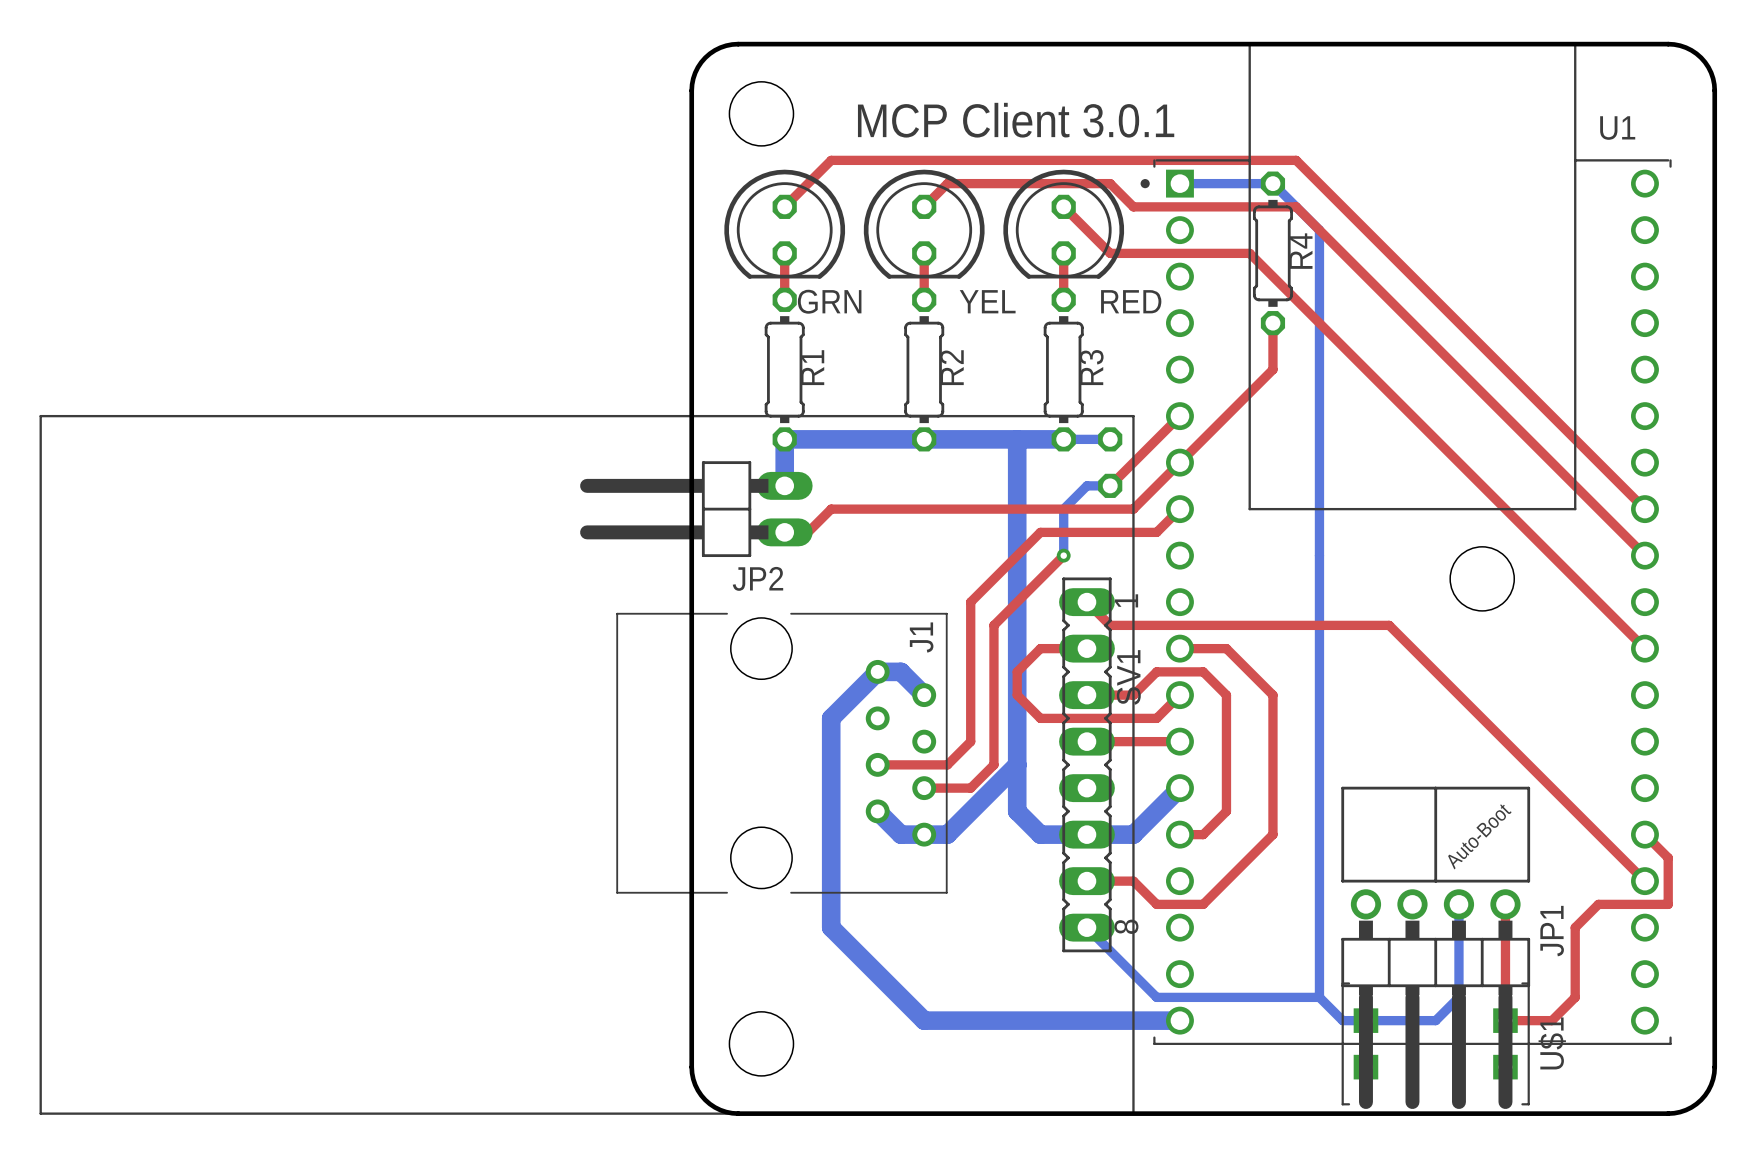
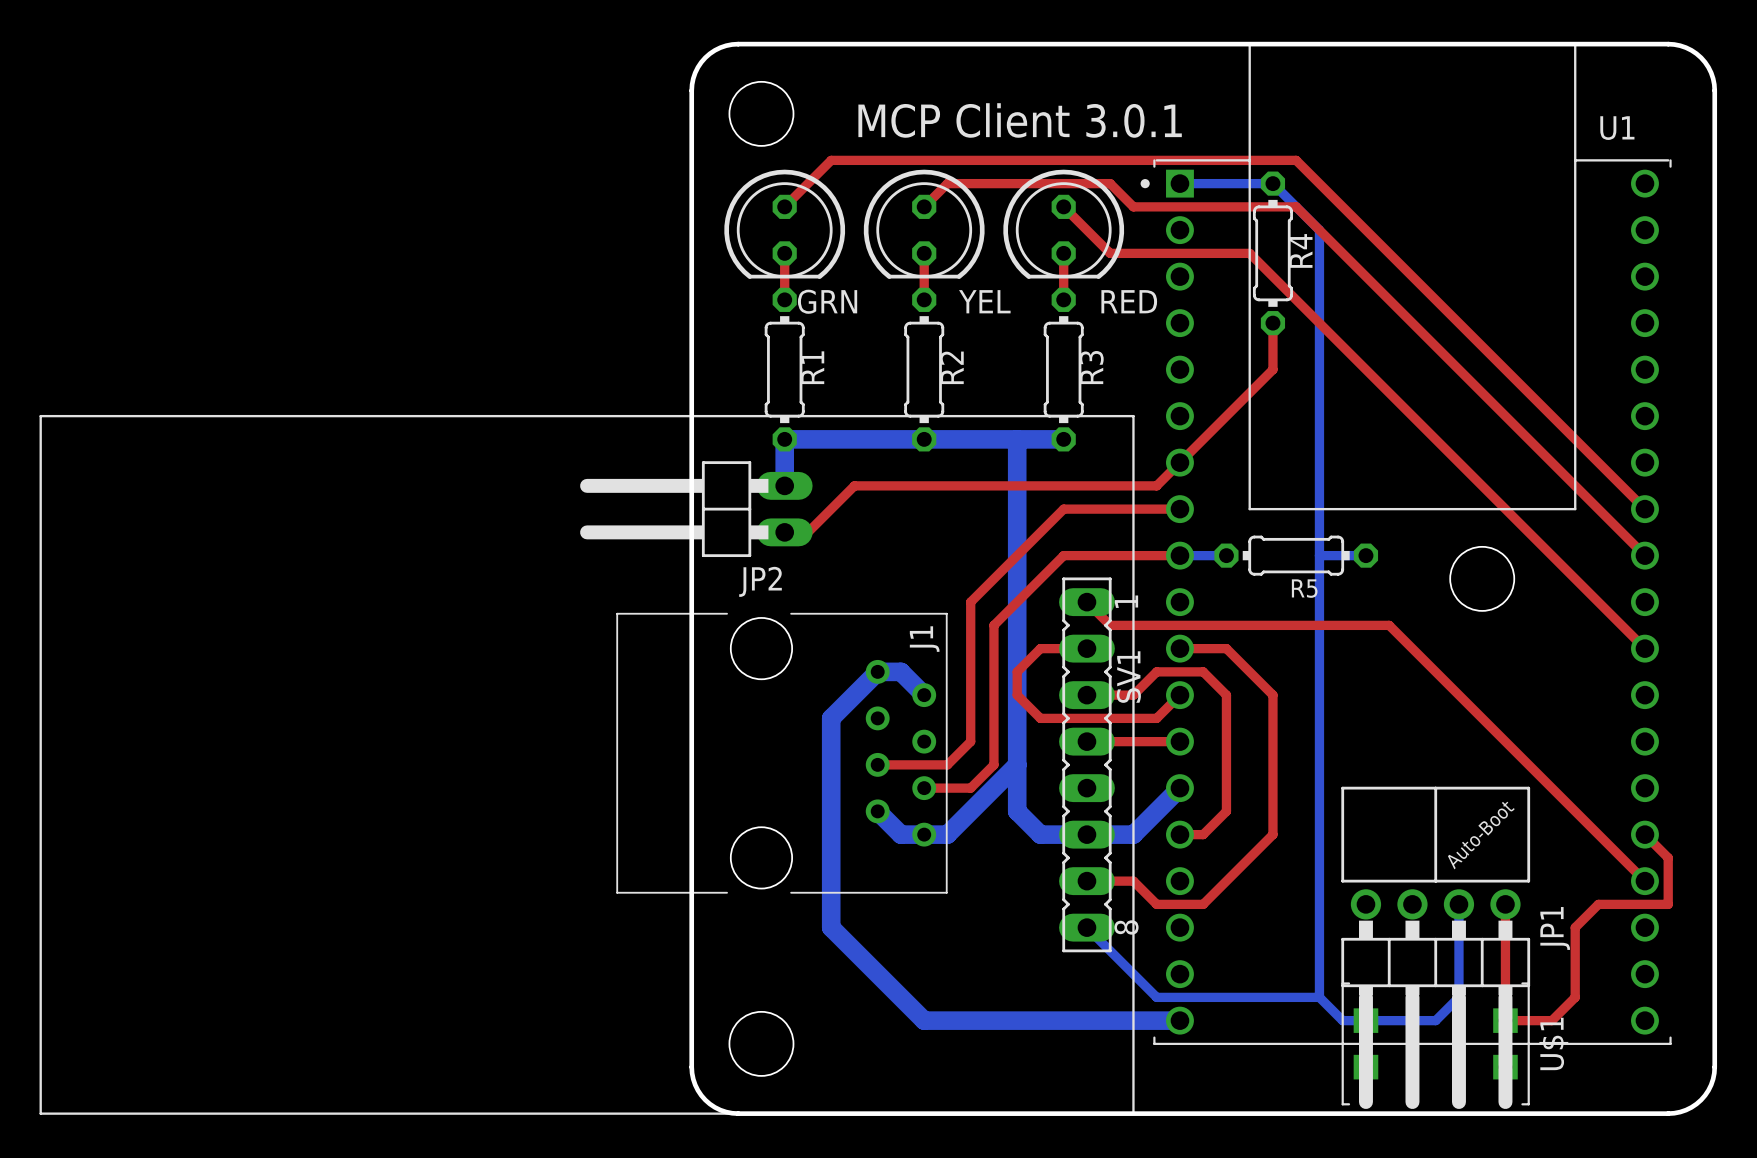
top track: (1179, 416) (1110, 485) -> none
bottom track: (1063, 439) (1110, 439) -> (1179, 555) (1226, 555)
part: (1110, 462) -> none
bottom track: (1110, 485) (1086, 485) (1063, 509) (1063, 555) -> none
top track: (1156, 485) (1133, 509) -> (1179, 509) (1133, 509)
top track: (831, 509) (1063, 509) -> (831, 509) (854, 485) (1156, 485)
top track: (1179, 509) (1156, 532) (1040, 532) -> (1063, 509) (1040, 532)
top track: none -> (1063, 555) (1179, 555)
via: (1063, 555) -> none
R5: none -> (1296, 555)
bottom track: none -> (1319, 555) (1365, 555)

